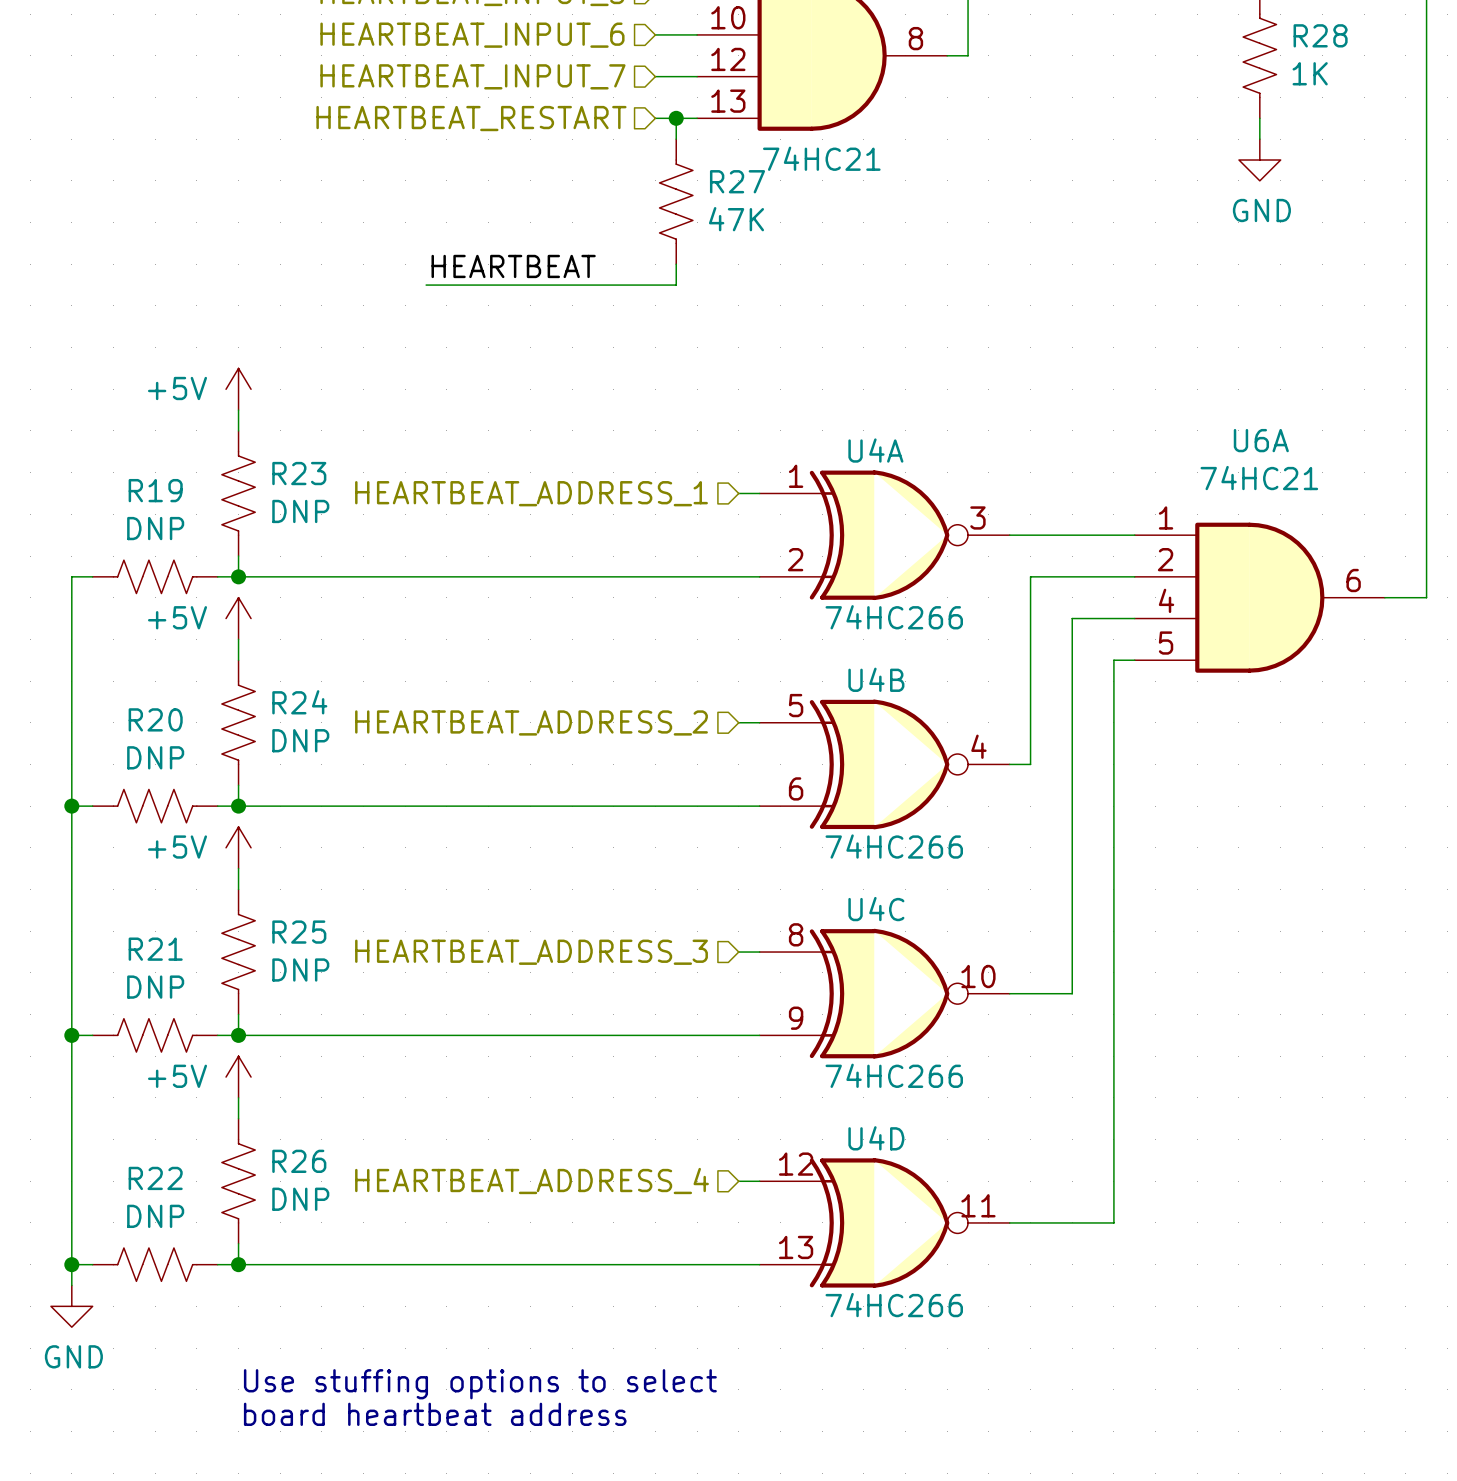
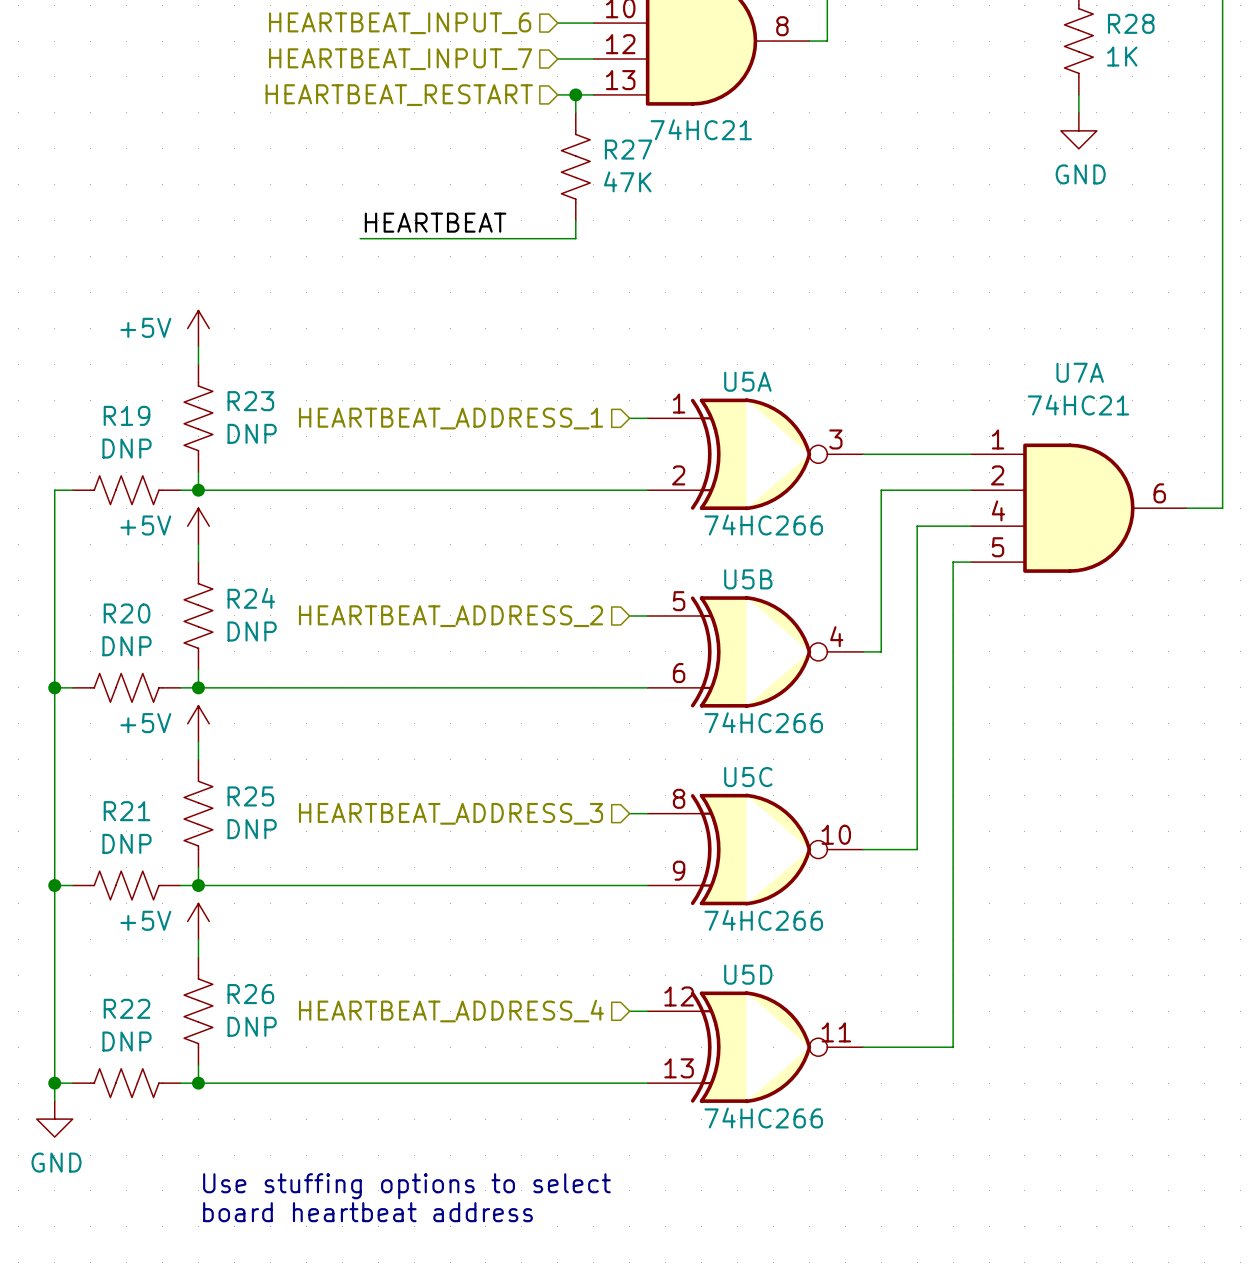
U6A name: U6A (1261, 440) -> U7A (1080, 372)
U4A name: U4A (875, 450) -> U5A (747, 381)
U4B name: U4B (876, 679) -> U5B (748, 579)
U4C name: U4C (876, 909) -> U5C (748, 777)
U4D name: U4D (876, 1138) -> U5D (748, 974)

